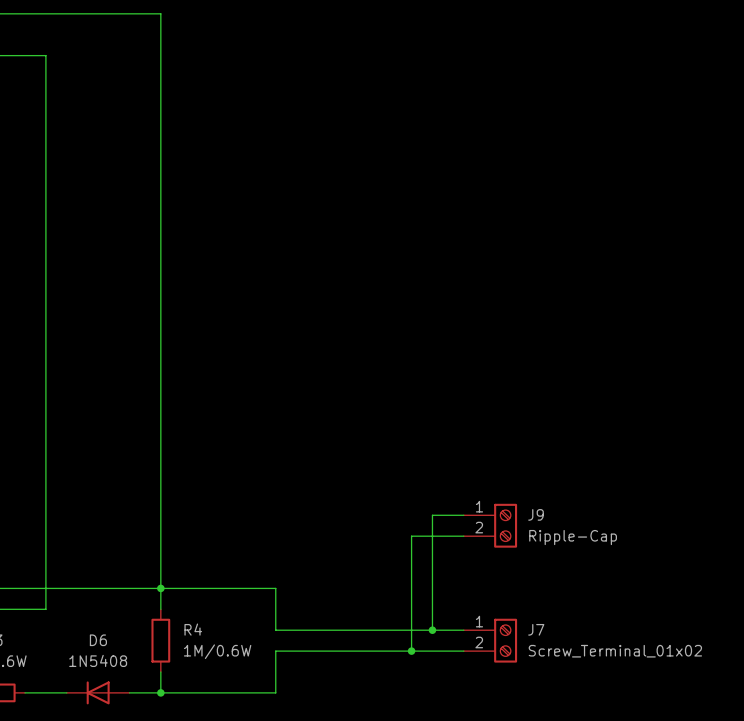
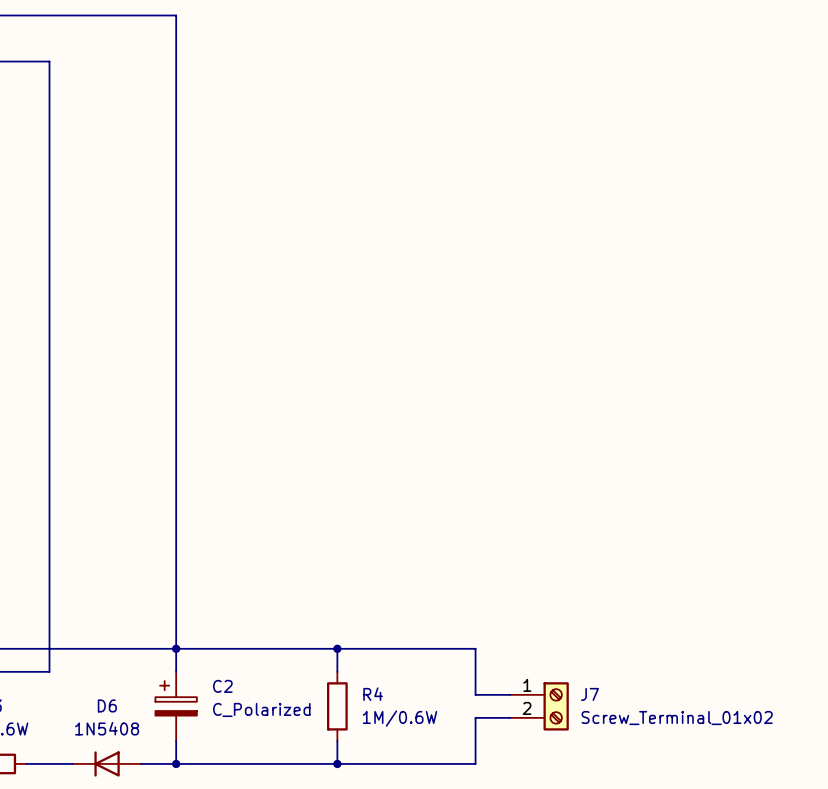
wire: (463, 515) (432, 515) (432, 588) -> none
J9: Ripple-Cap (490, 525) -> none
wire: (463, 536) (411, 536) (411, 651) -> none
wire: (275, 588) (275, 630) (432, 630) -> (302, 648) (475, 648)
wire: none -> (337, 648) (337, 671)
junction: none -> (337, 648)
junction: (432, 630) -> none
R4 position: (160, 640) -> (337, 706)
C2: none -> C_Polarized (176, 706)
junction: (411, 651) -> none
wire: (432, 651) (275, 651) (275, 692) -> (475, 717) (475, 763) (302, 763)
wire: none -> (337, 740) (337, 763)
junction: none -> (337, 763)

